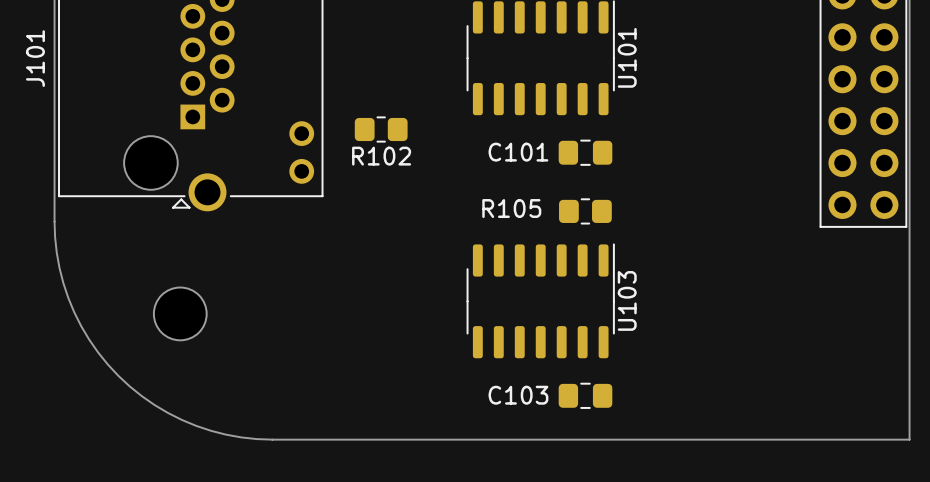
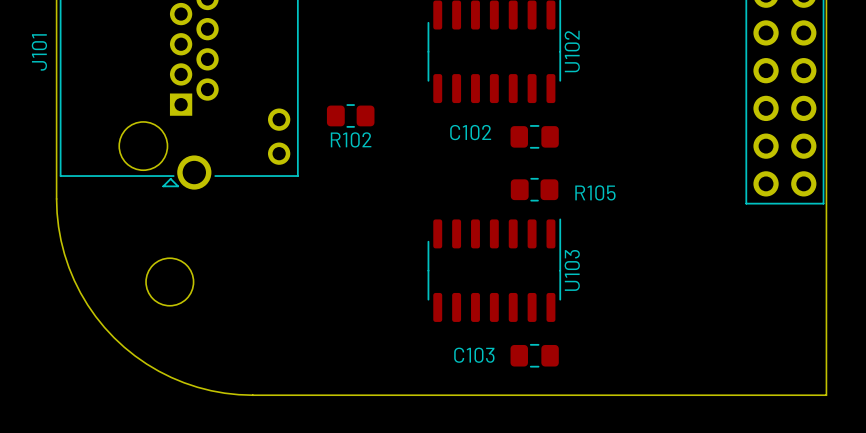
U101 name: U101 (627, 57) -> U102 (572, 51)
C101 name: C101 (518, 152) -> C102 (470, 132)
R105 name position: R105 (511, 208) -> R105 (595, 192)

